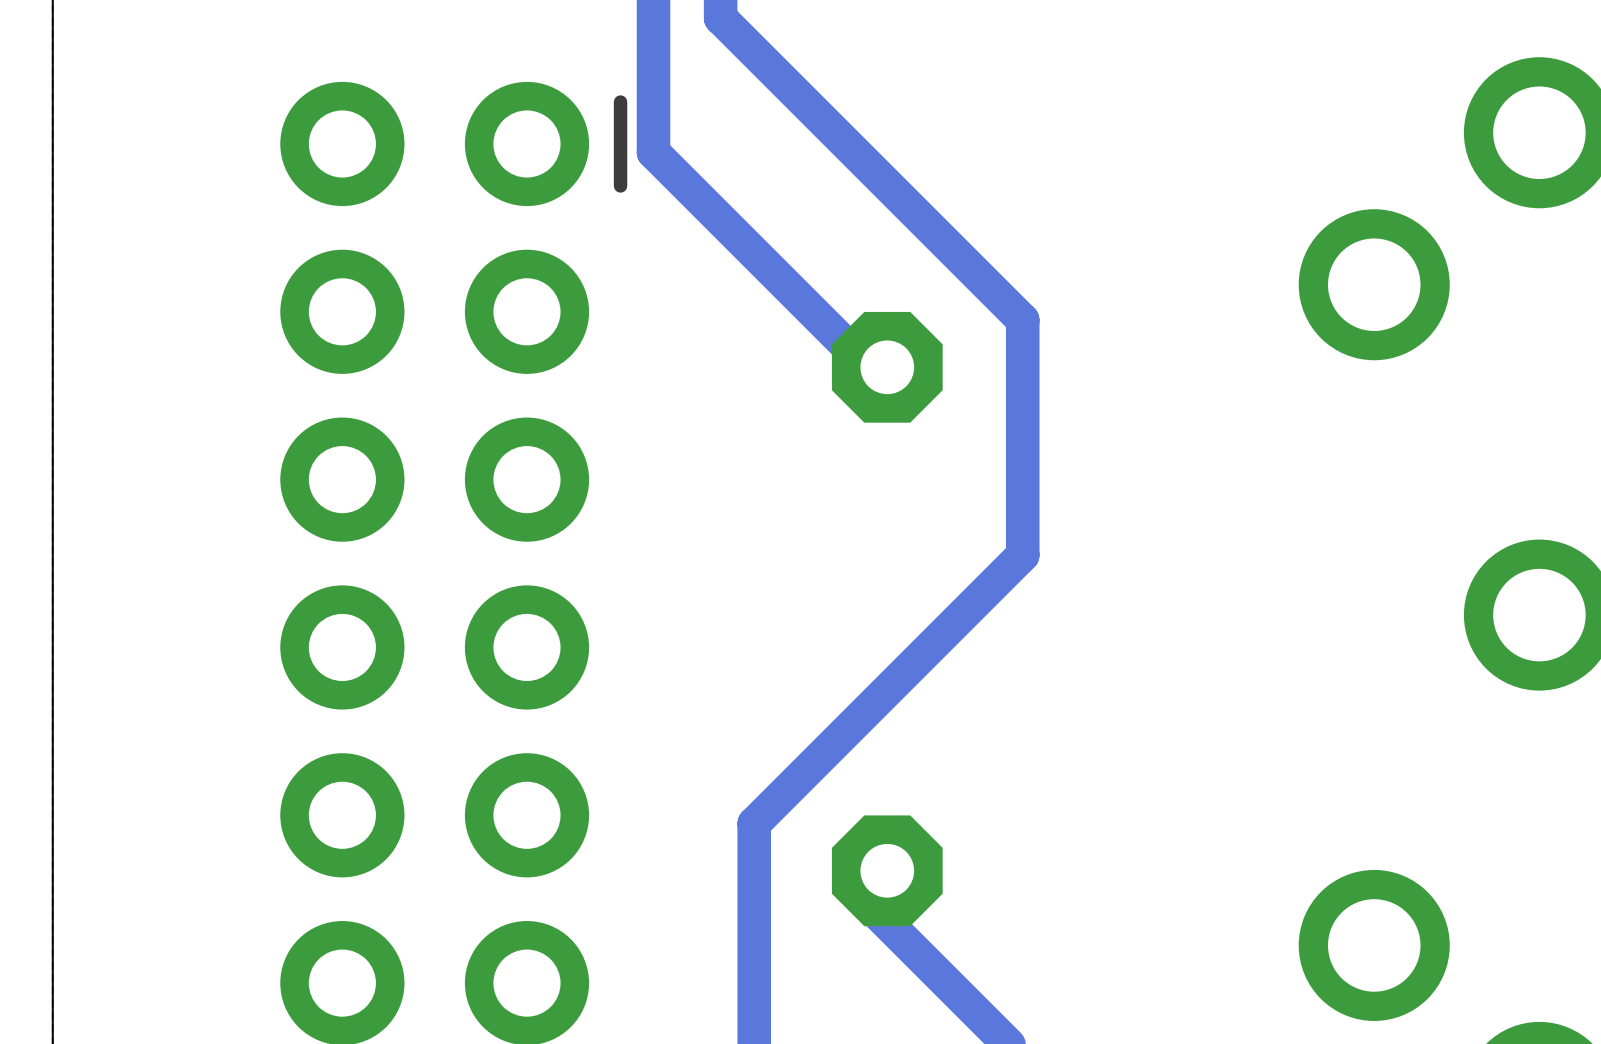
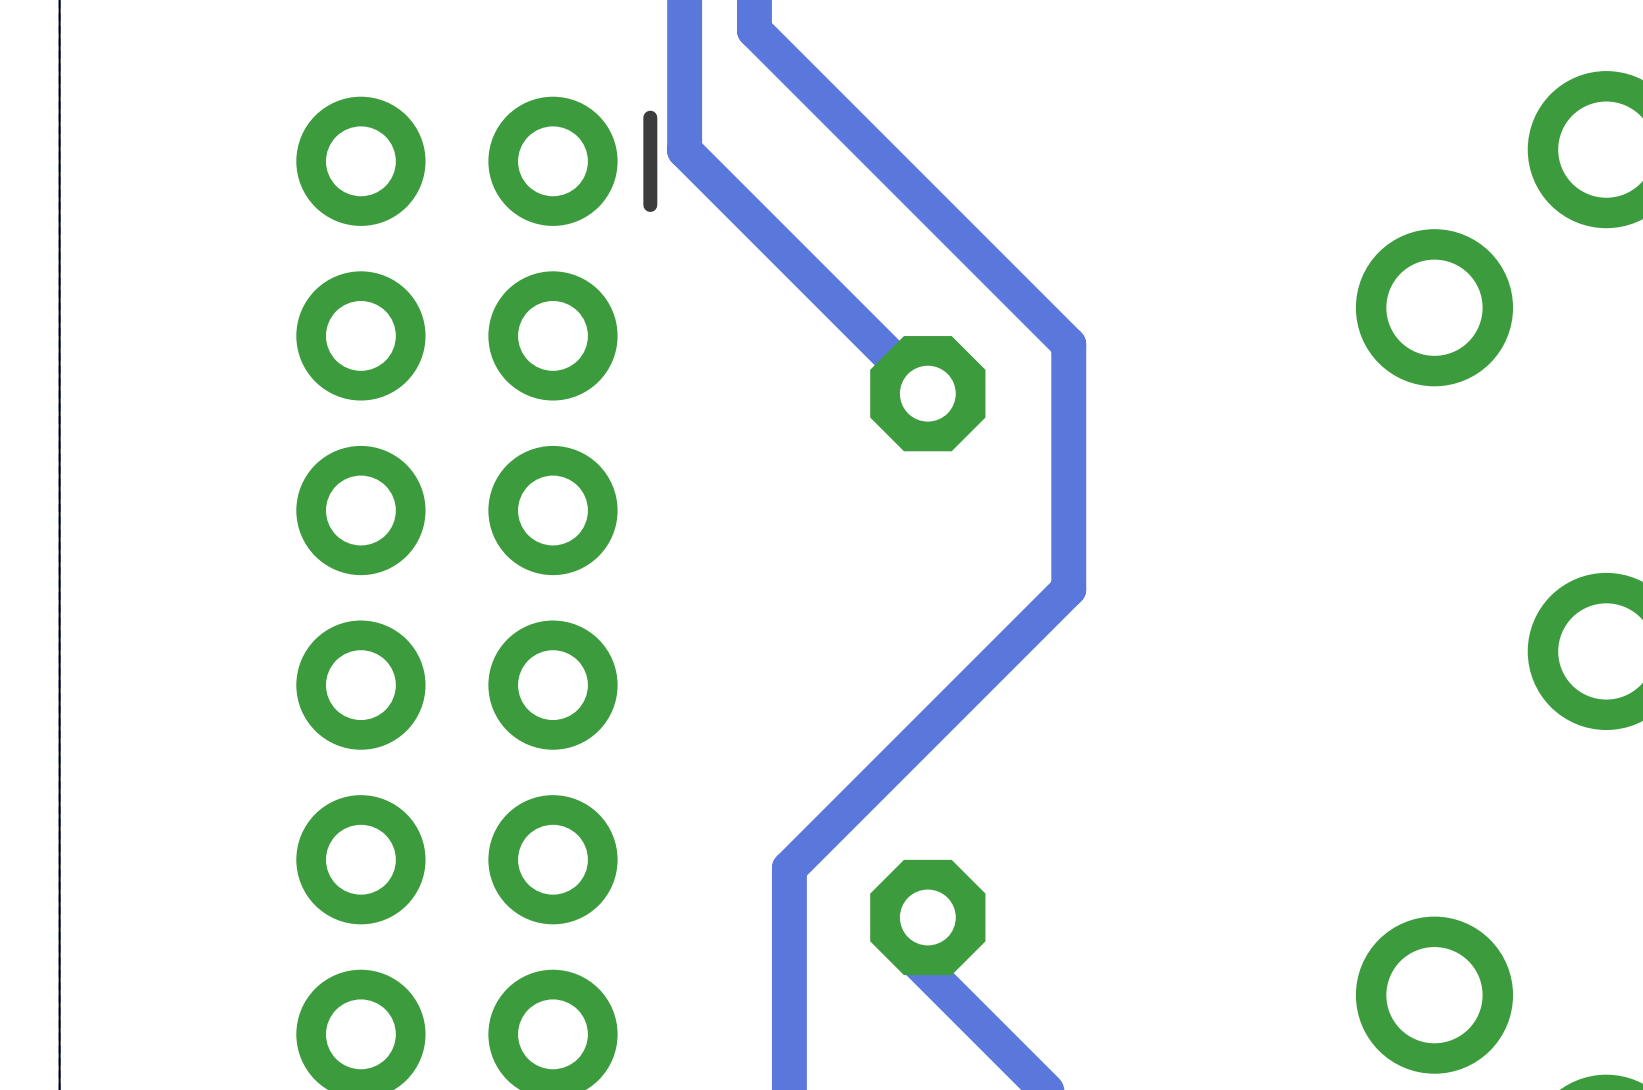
track: (653, 133) (653, 152) (854, 353) (887, 367) -> (684, 150) (927, 393)

